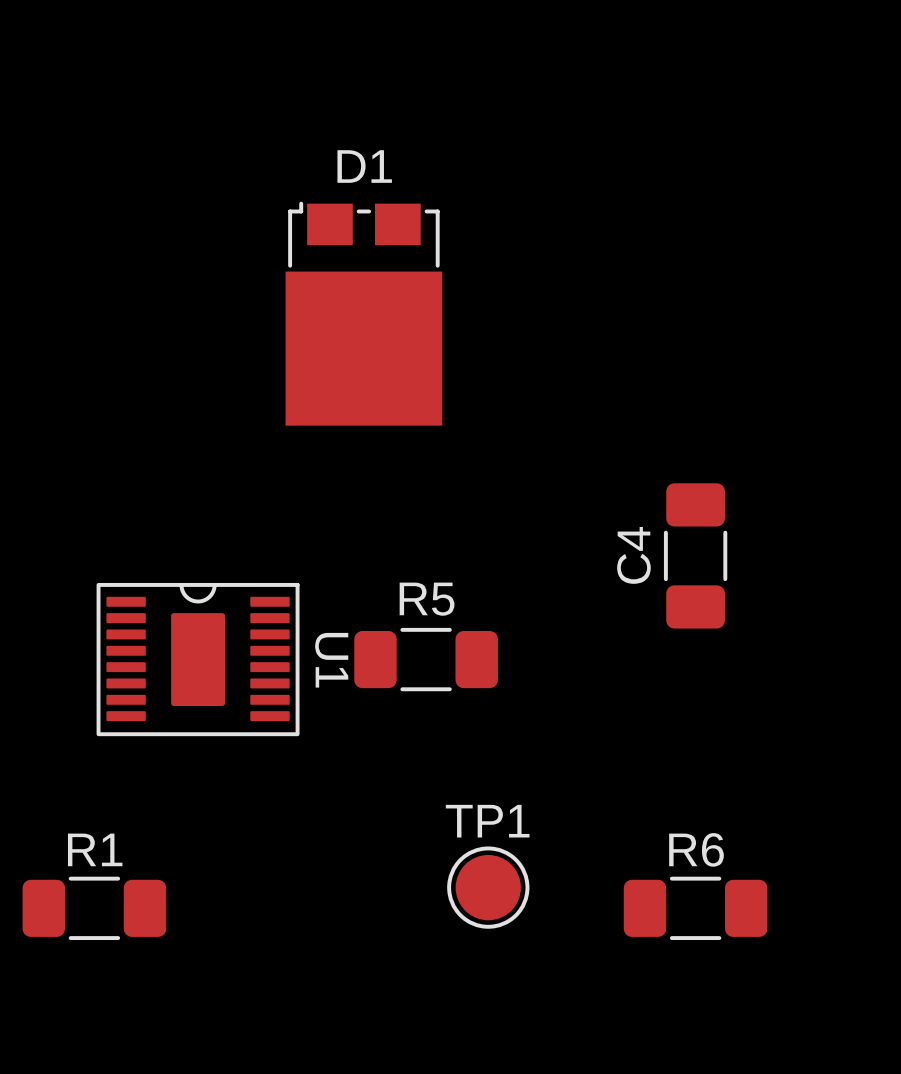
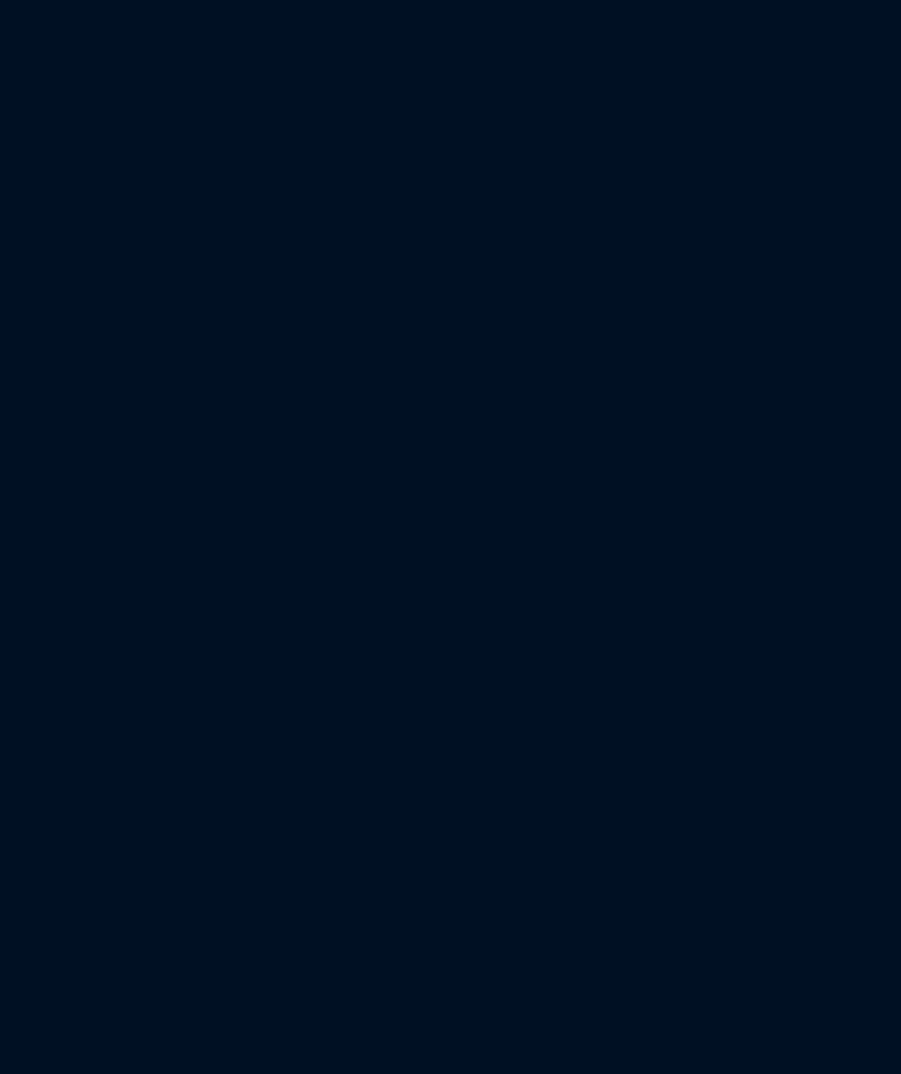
D1: (363, 313) -> none
C4: (695, 555) -> none
U1: (198, 659) -> none
R5: (426, 659) -> none
TP1: (488, 887) -> none
R1: (94, 908) -> none
R6: (695, 908) -> none

